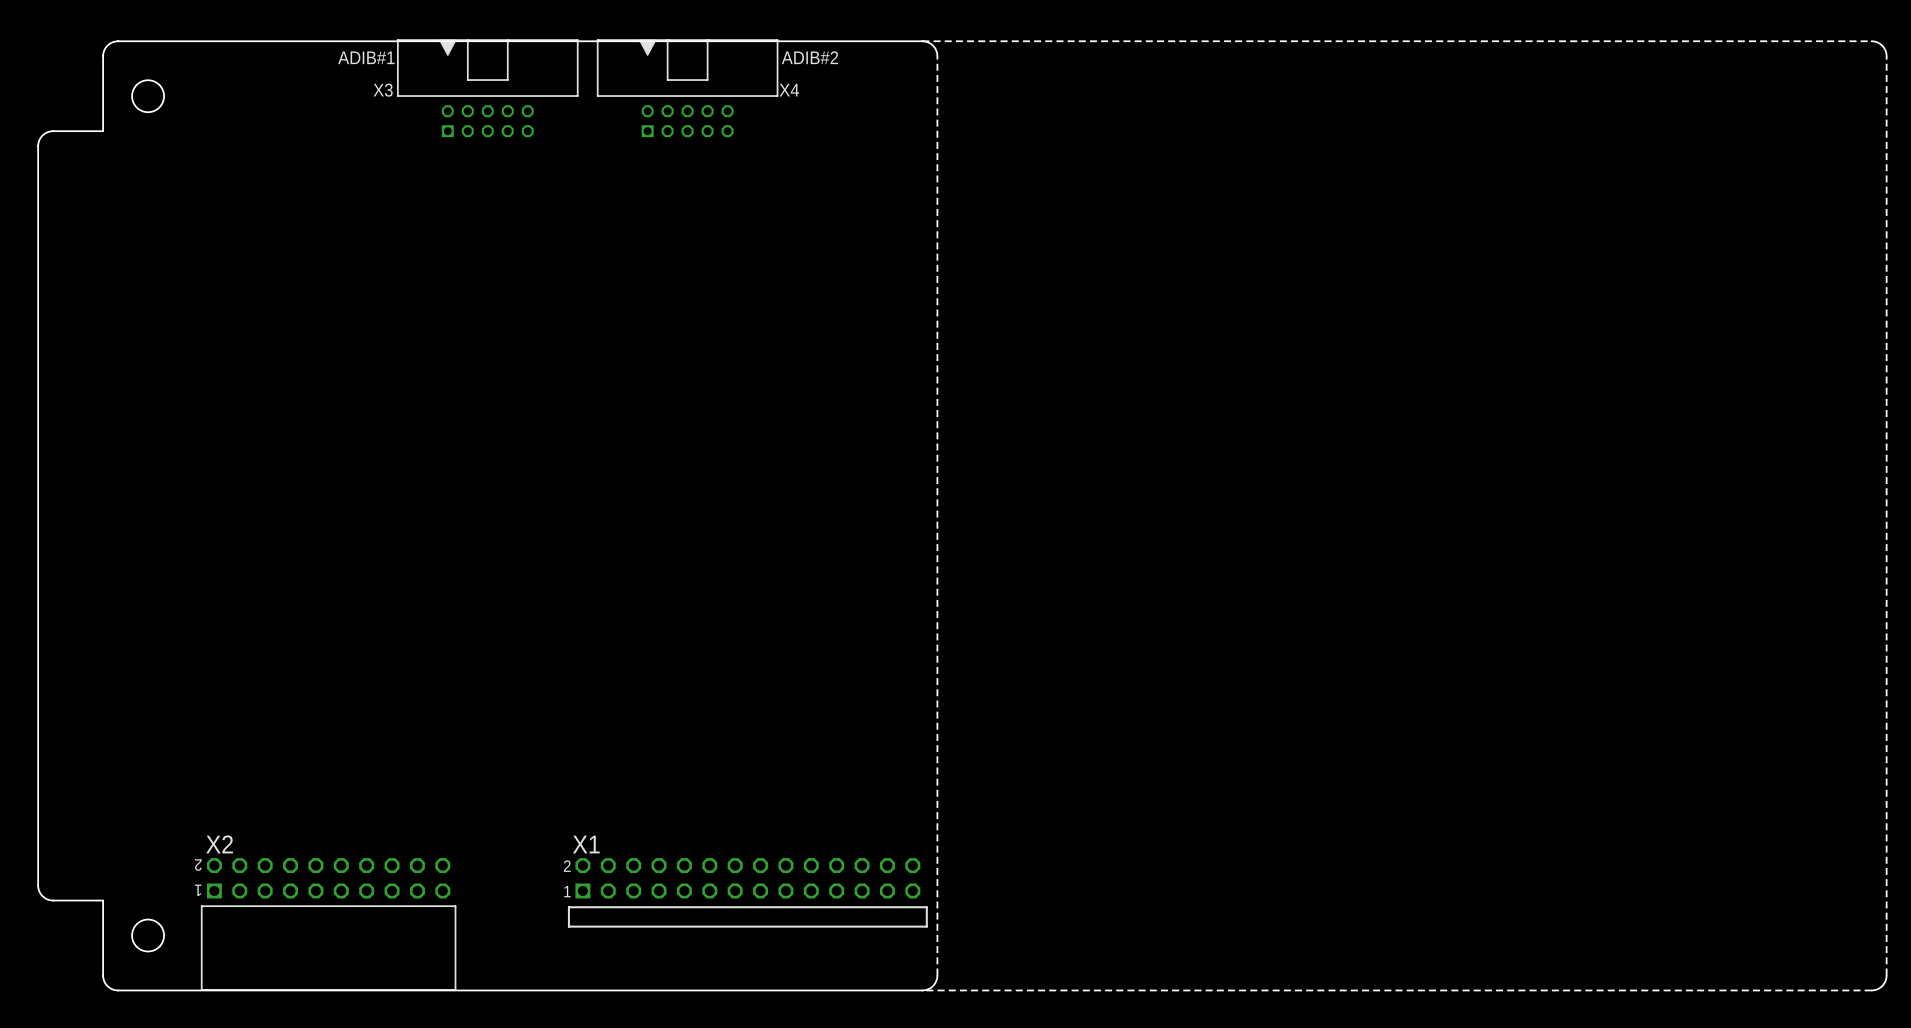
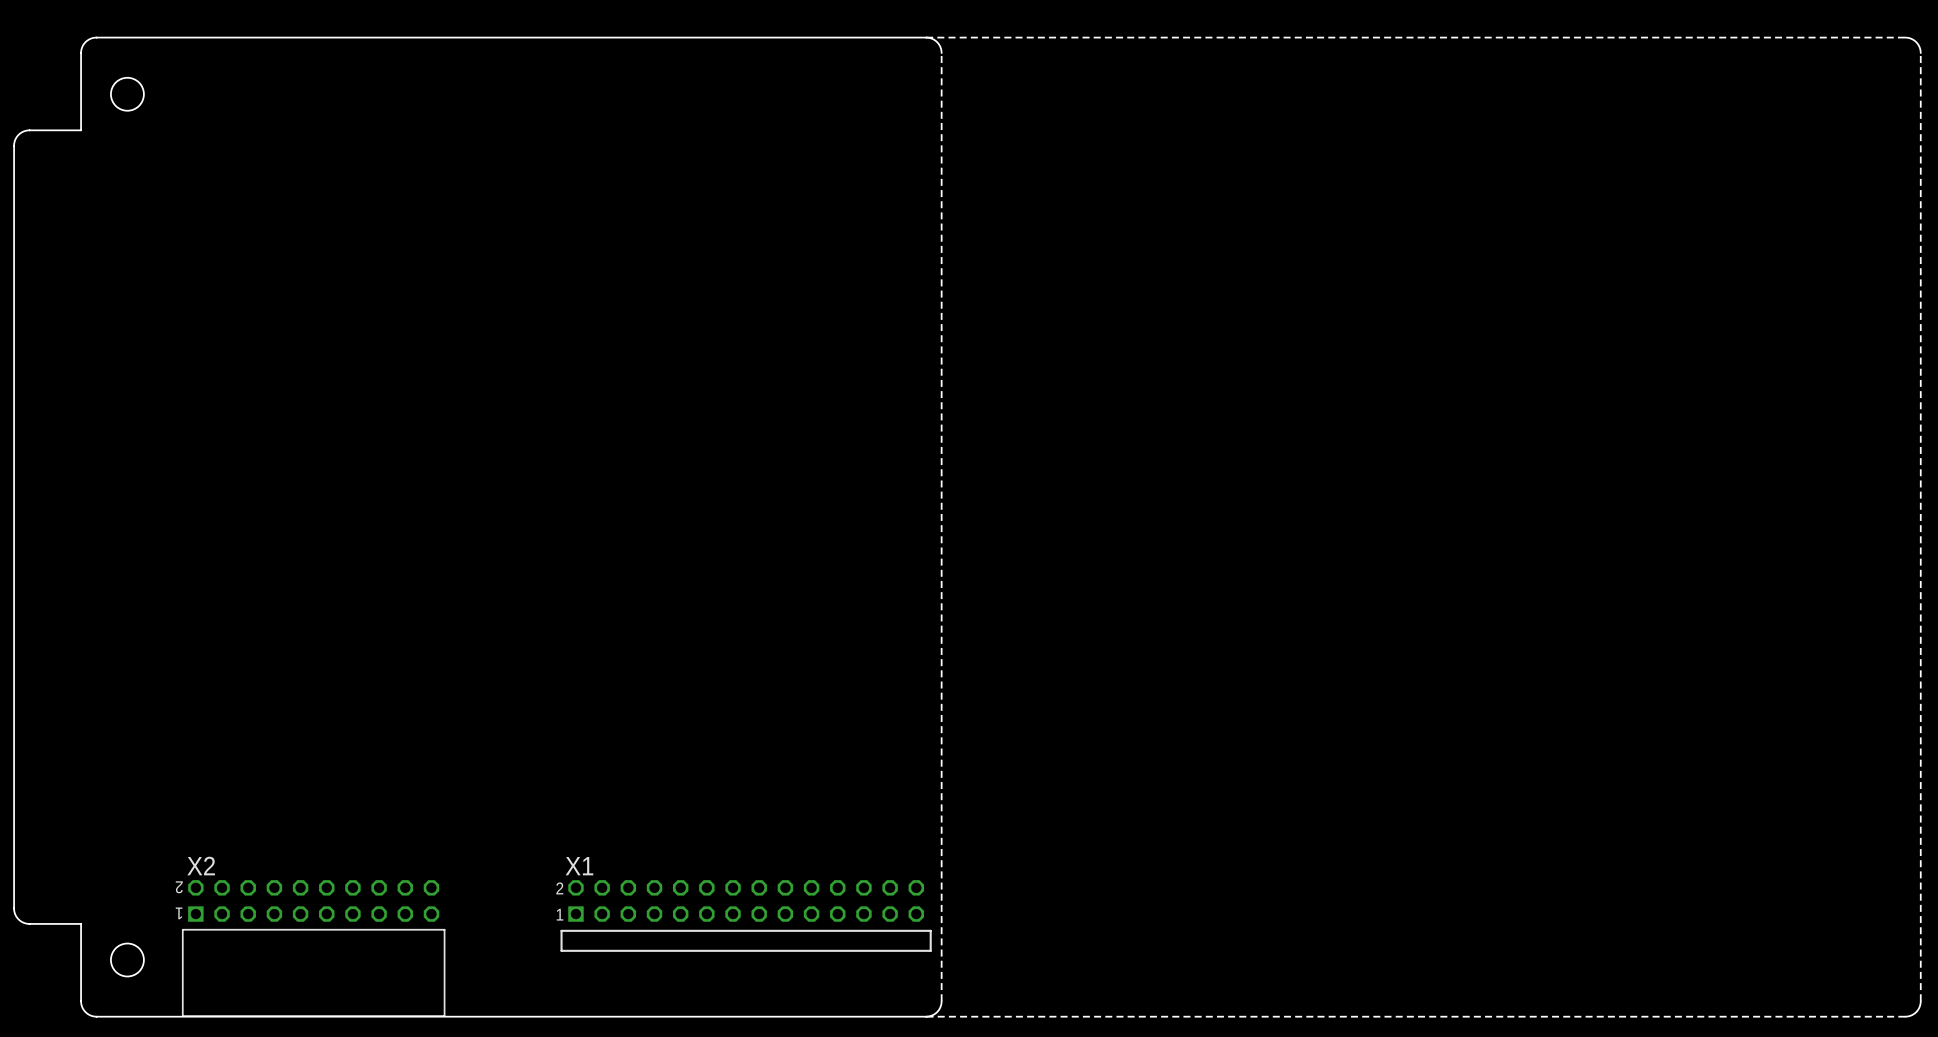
text: ADIB#1 (366, 57) -> none
text: ADIB#2 (809, 57) -> none
X3: (487, 88) -> none
X4: (687, 88) -> none

